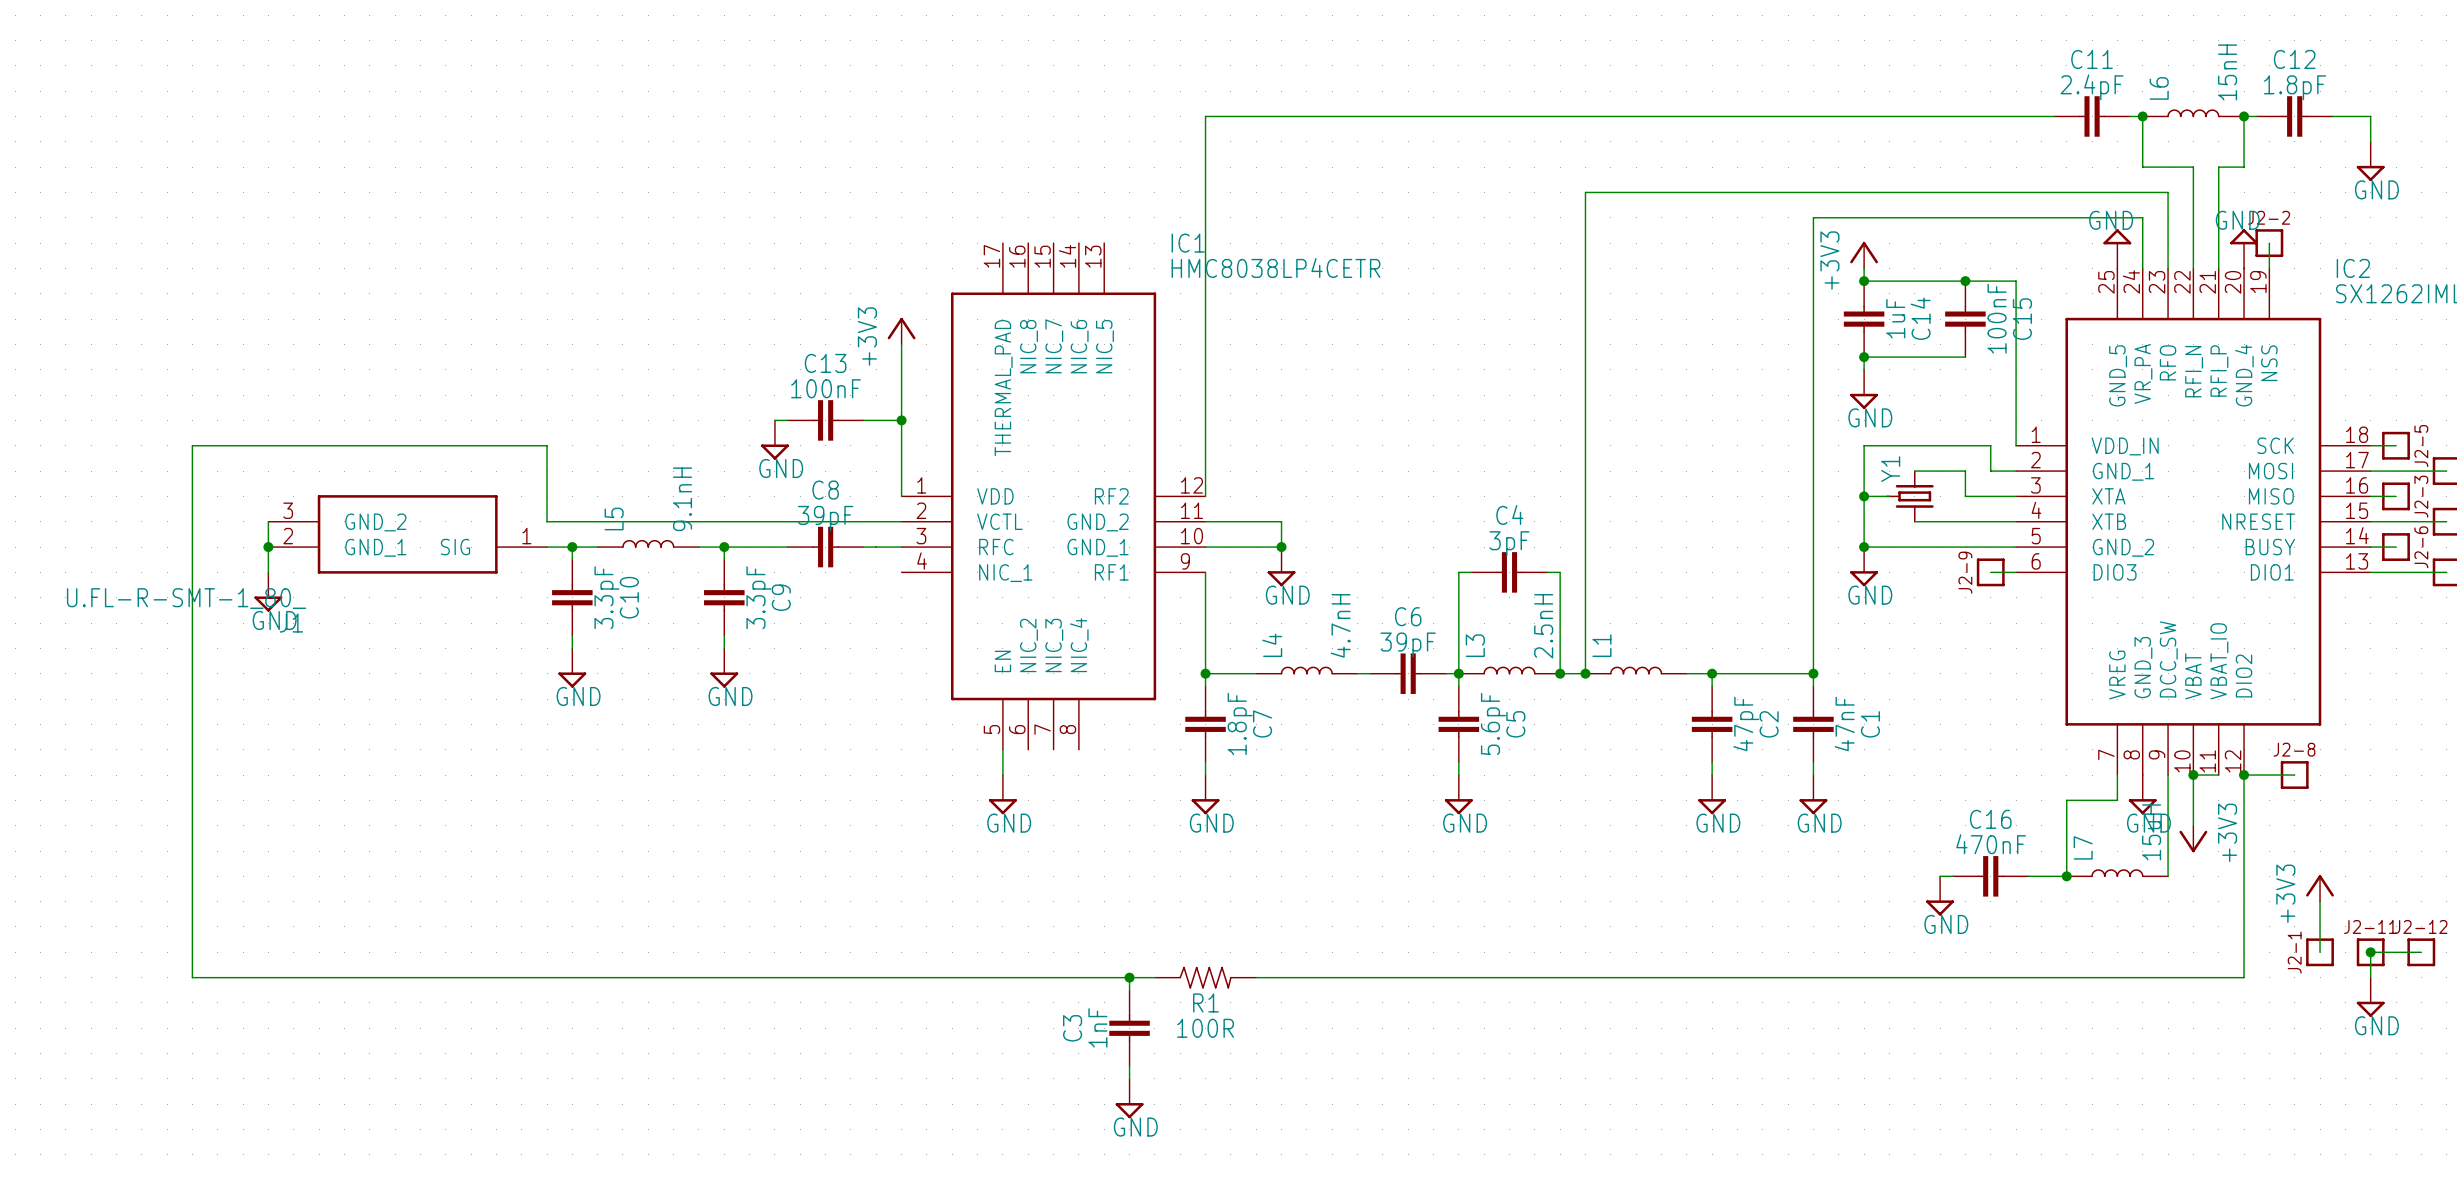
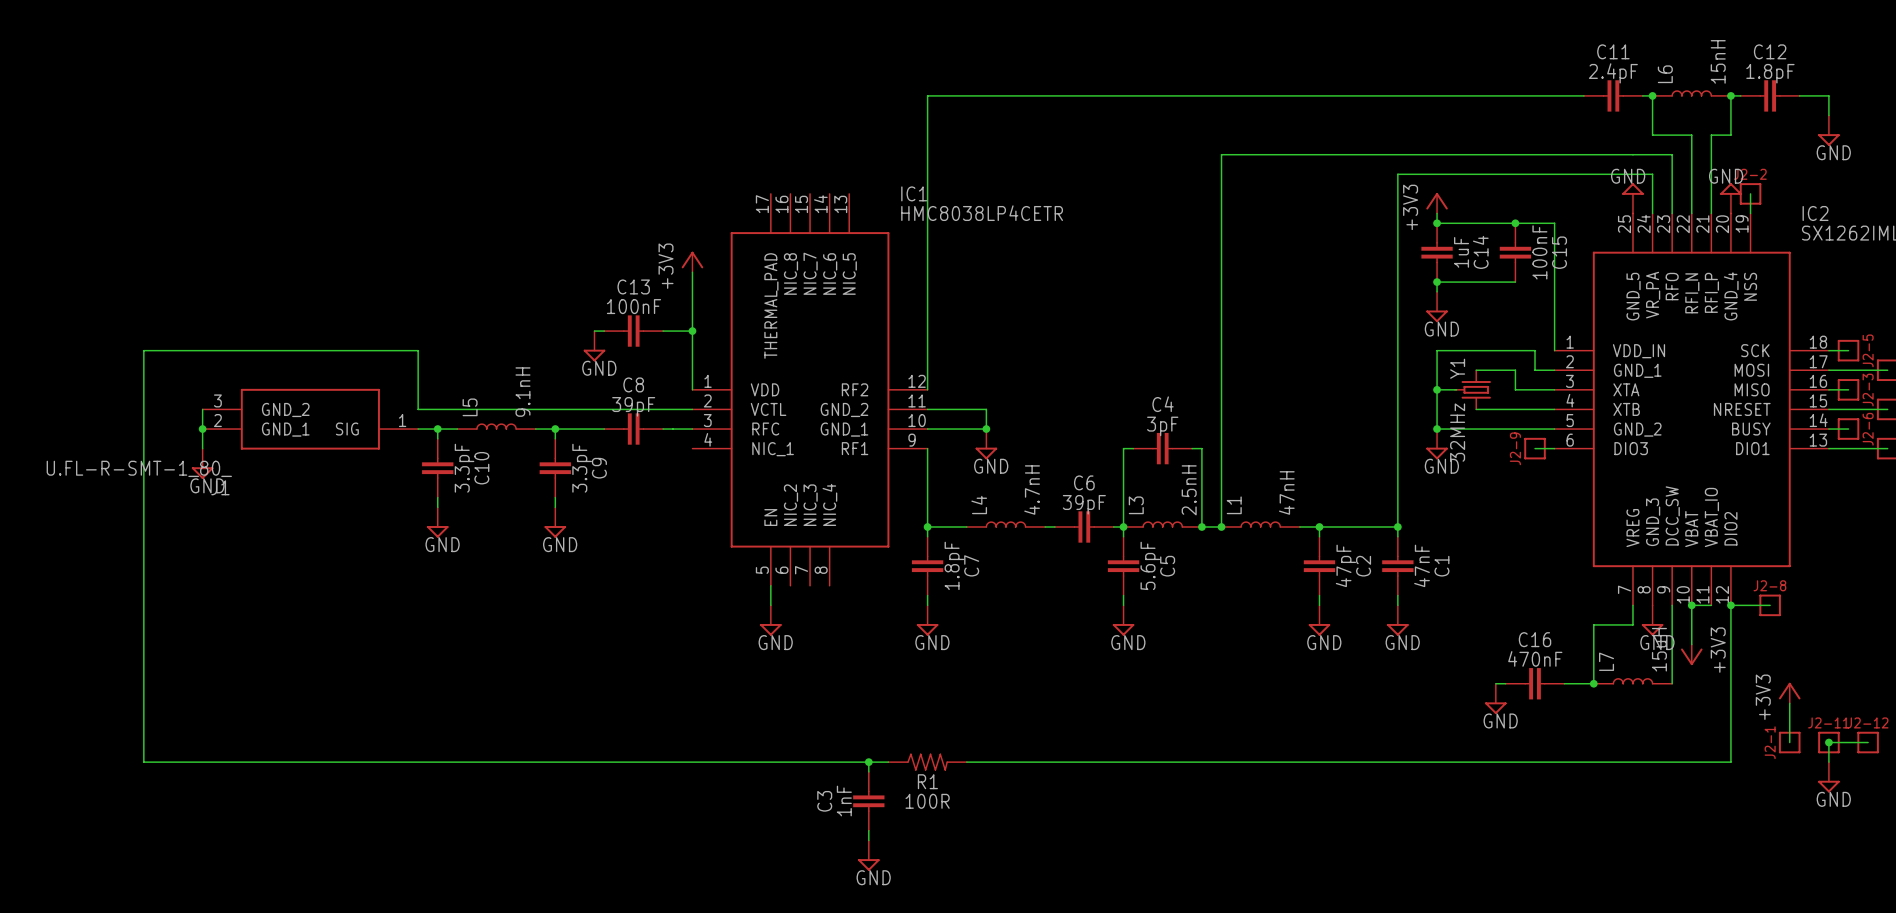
Y1 value: none -> 32MHz (1457, 432)
L1 value: none -> 47nH (1286, 492)

